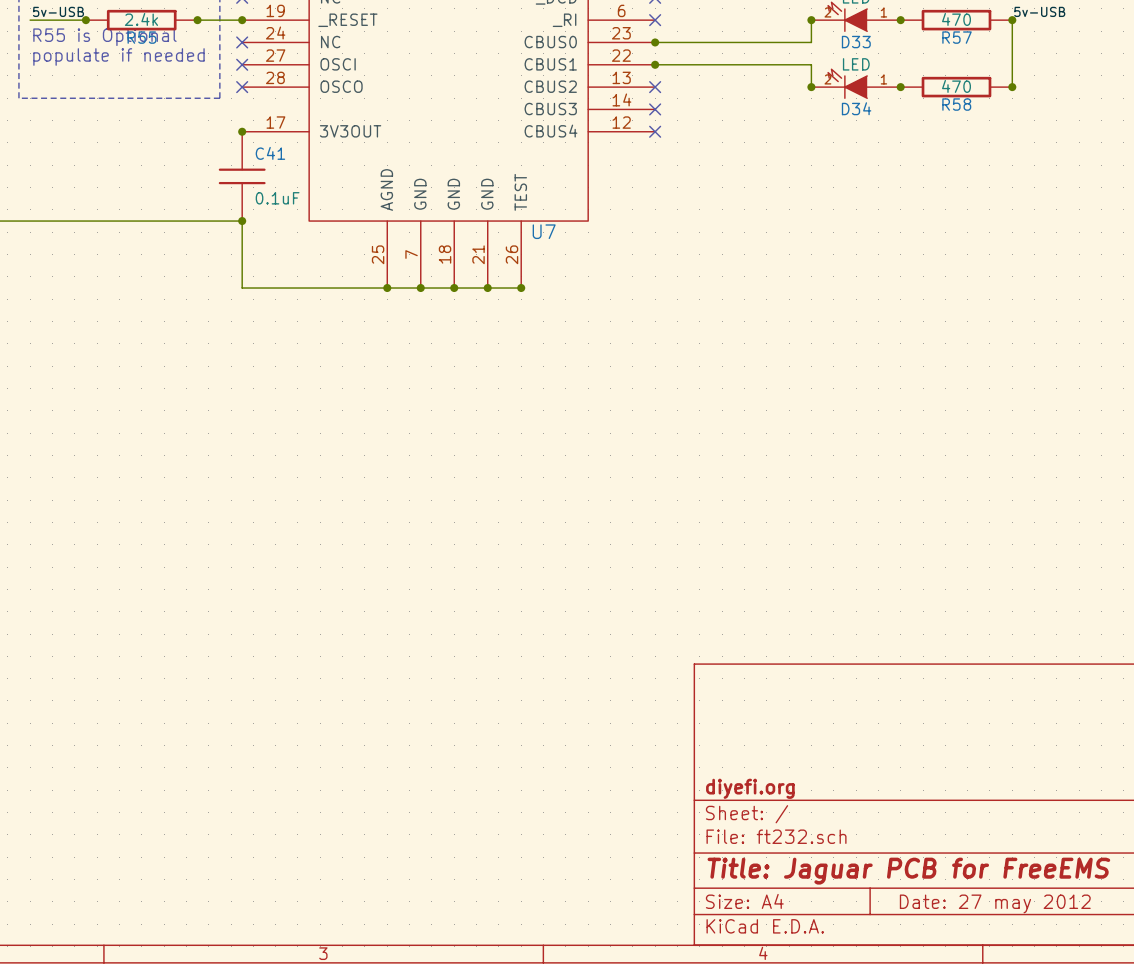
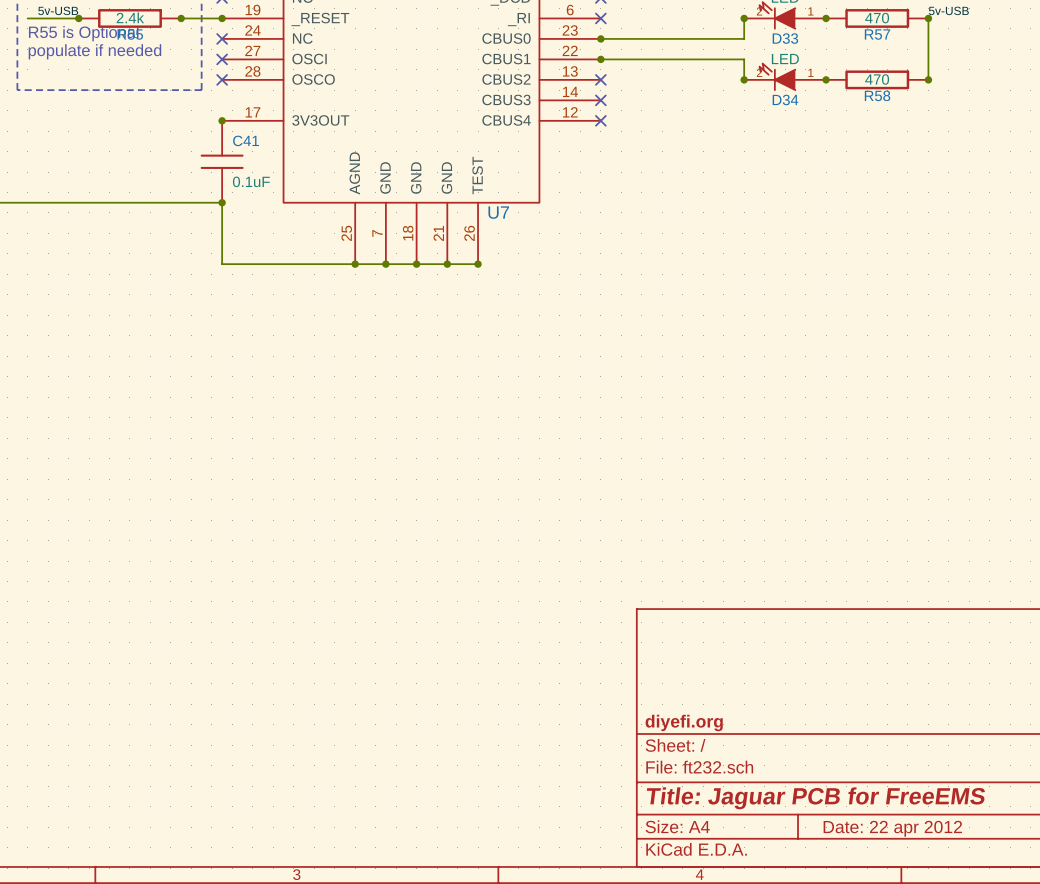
title block: Date: 27 may 2012 (995, 903) -> Date: 22 apr 2012 (892, 828)

